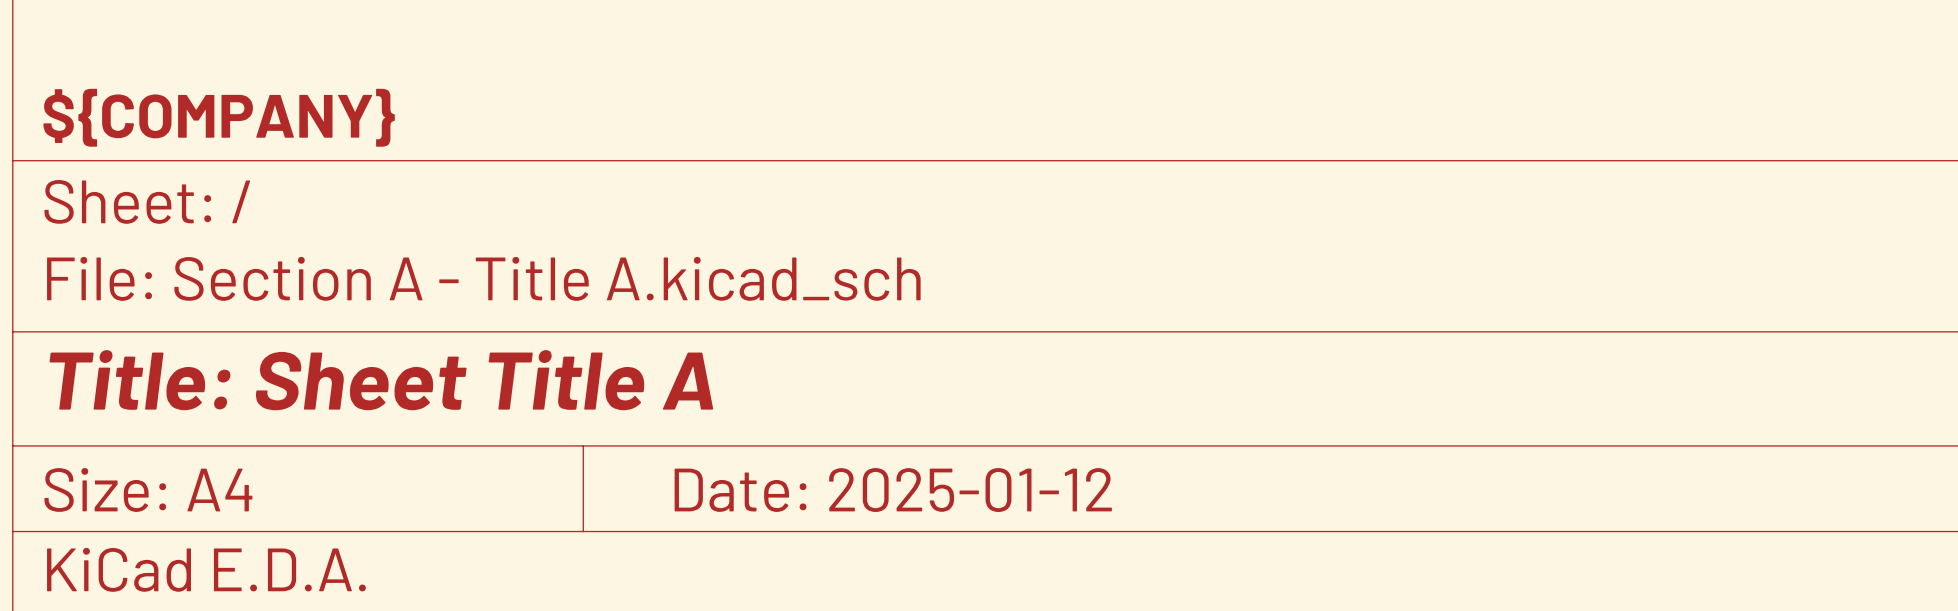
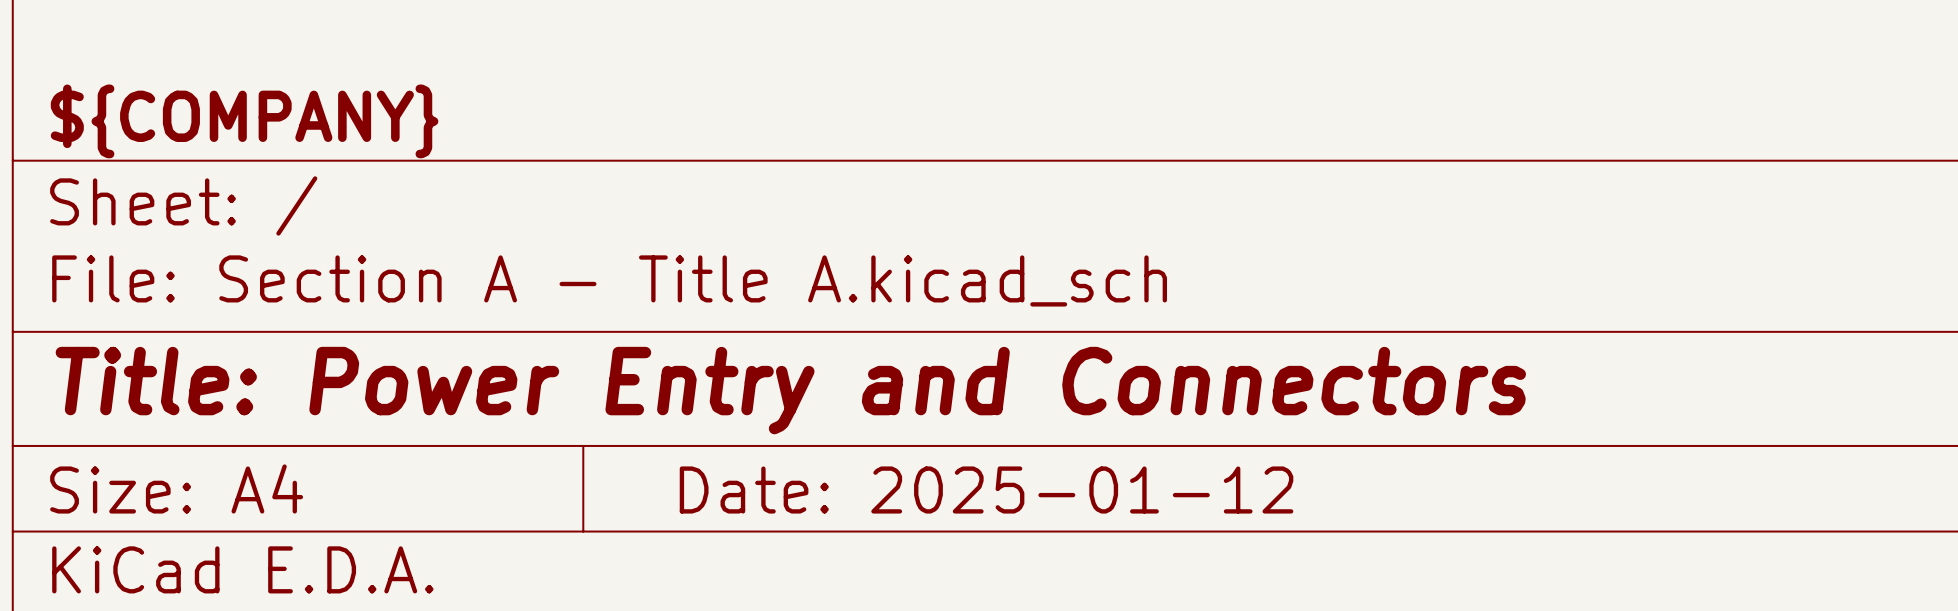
title block: Title: Sheet Title A (381, 380) -> Title: Power Entry and Connectors (790, 390)

